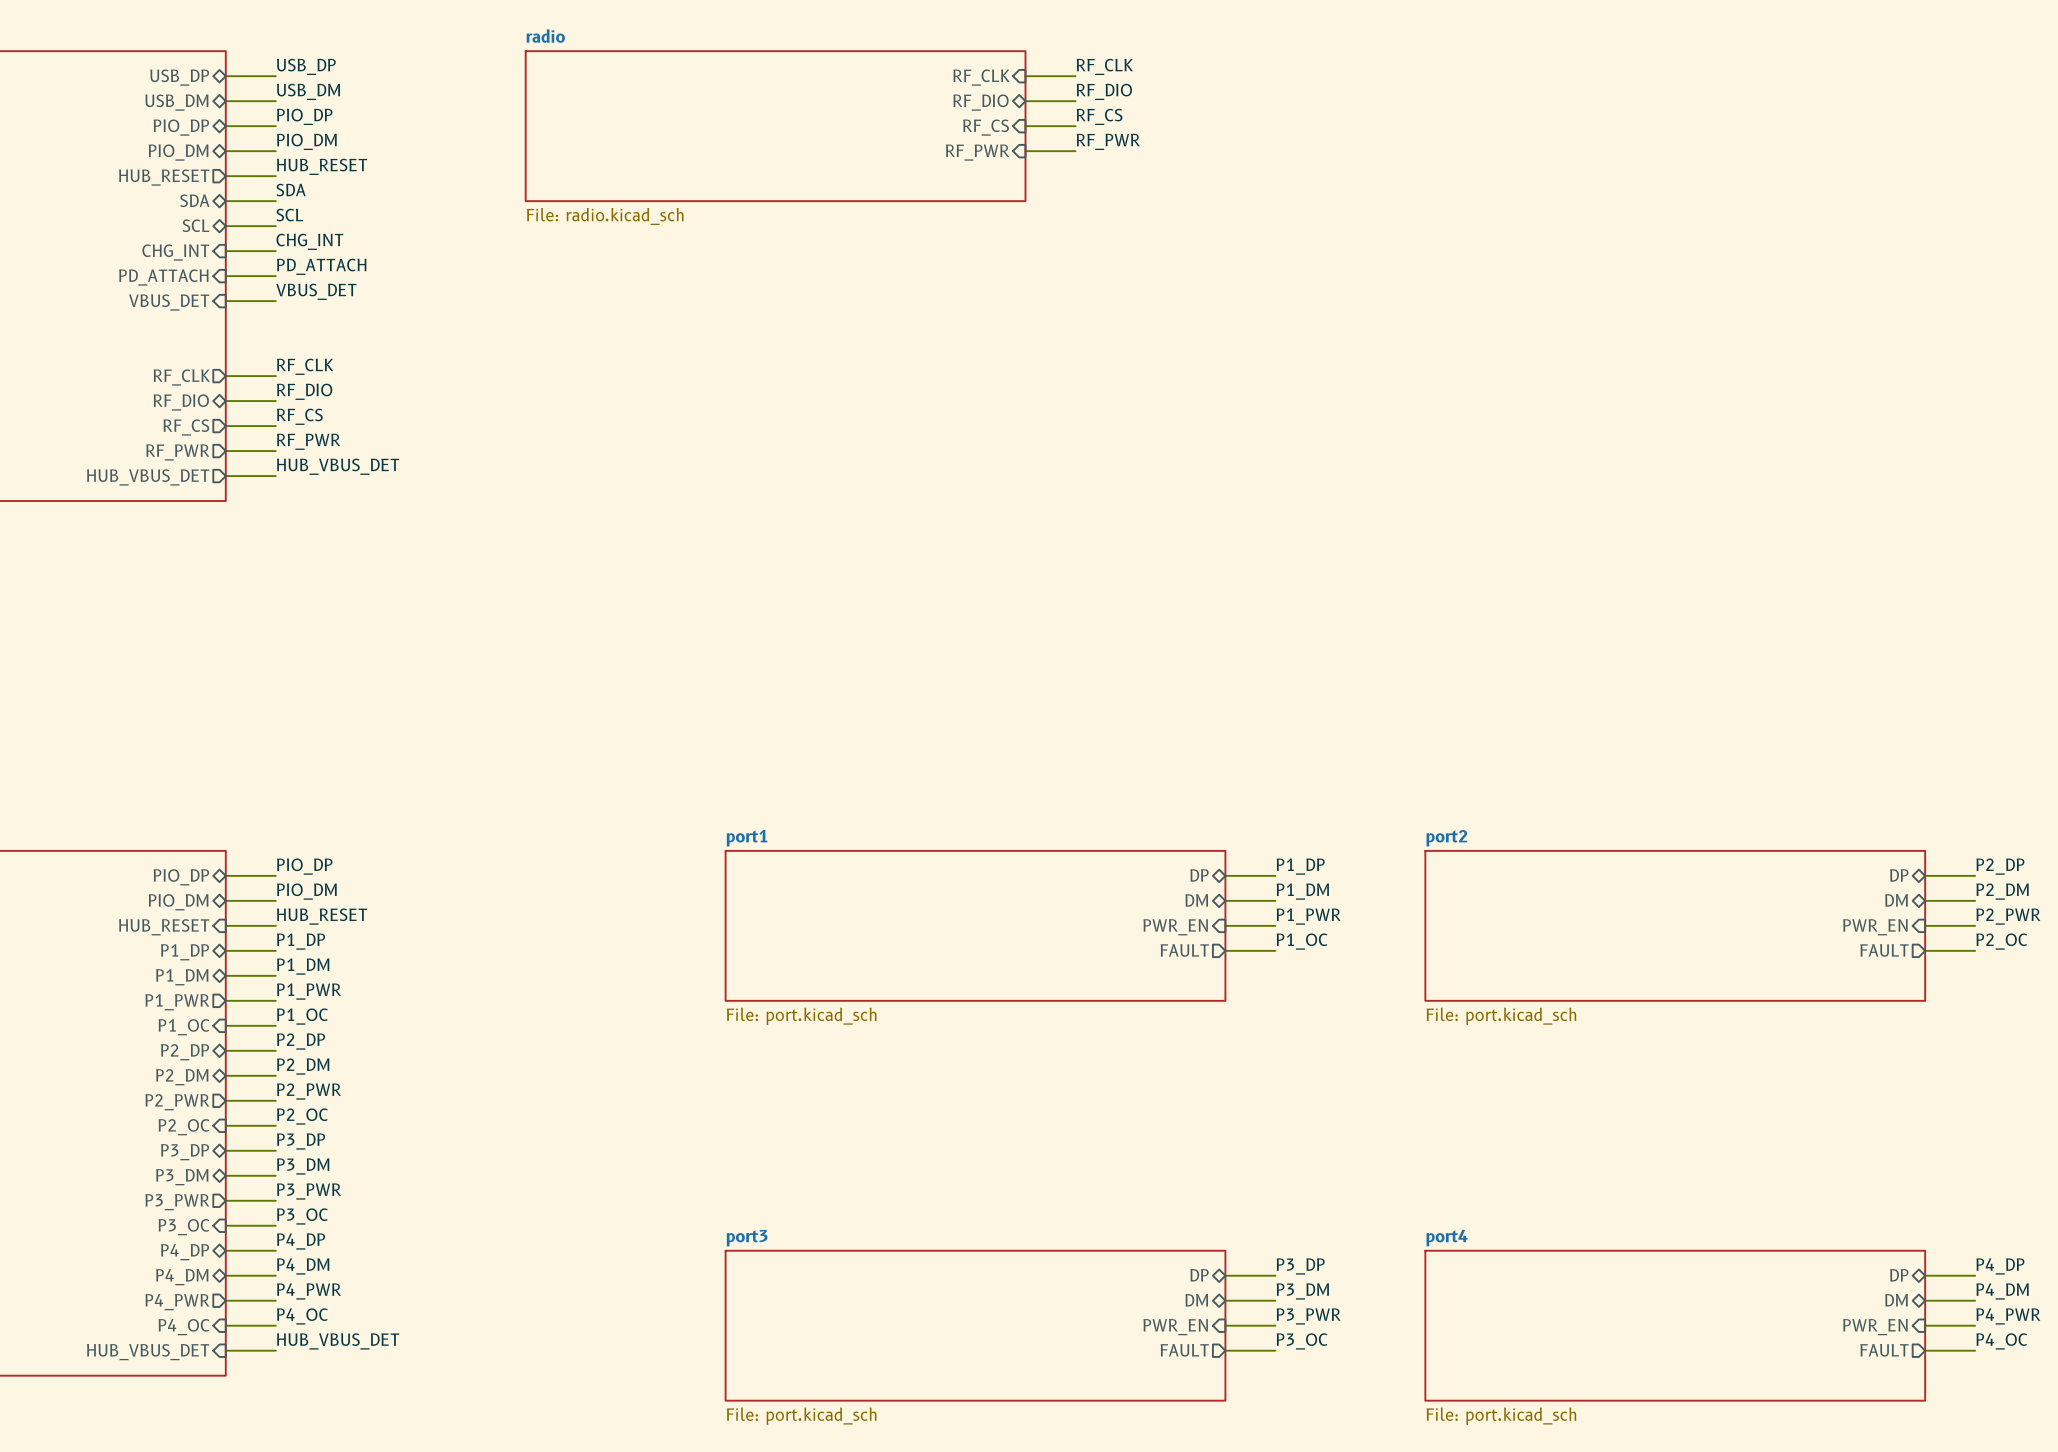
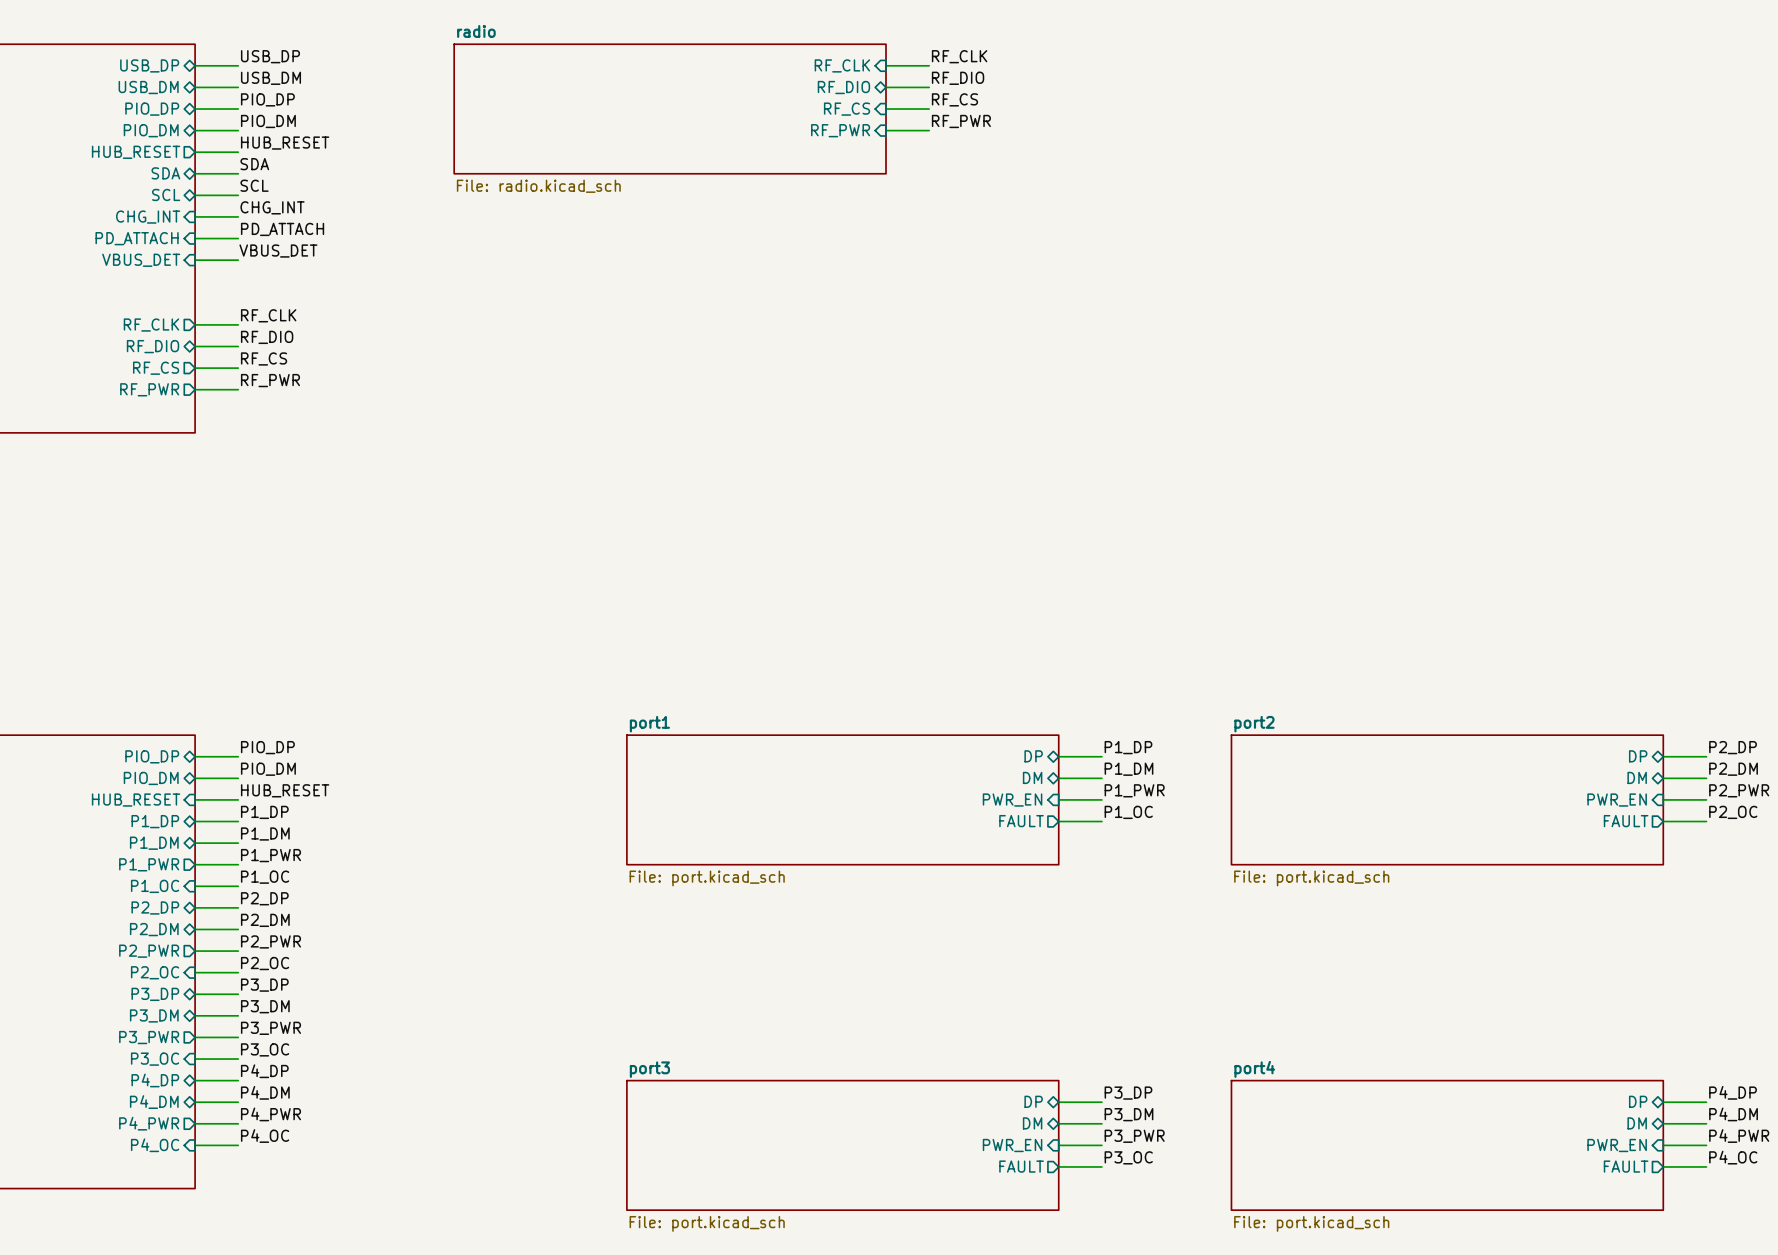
label: HUB_VBUS_DET (338, 466) -> none
wire: (225, 476) (275, 476) -> none
sheet pin: HUB_VBUS_DET (148, 477) -> none
label: HUB_VBUS_DET (338, 1341) -> none
wire: (225, 1350) (275, 1350) -> none
sheet pin: HUB_VBUS_DET (148, 1352) -> none

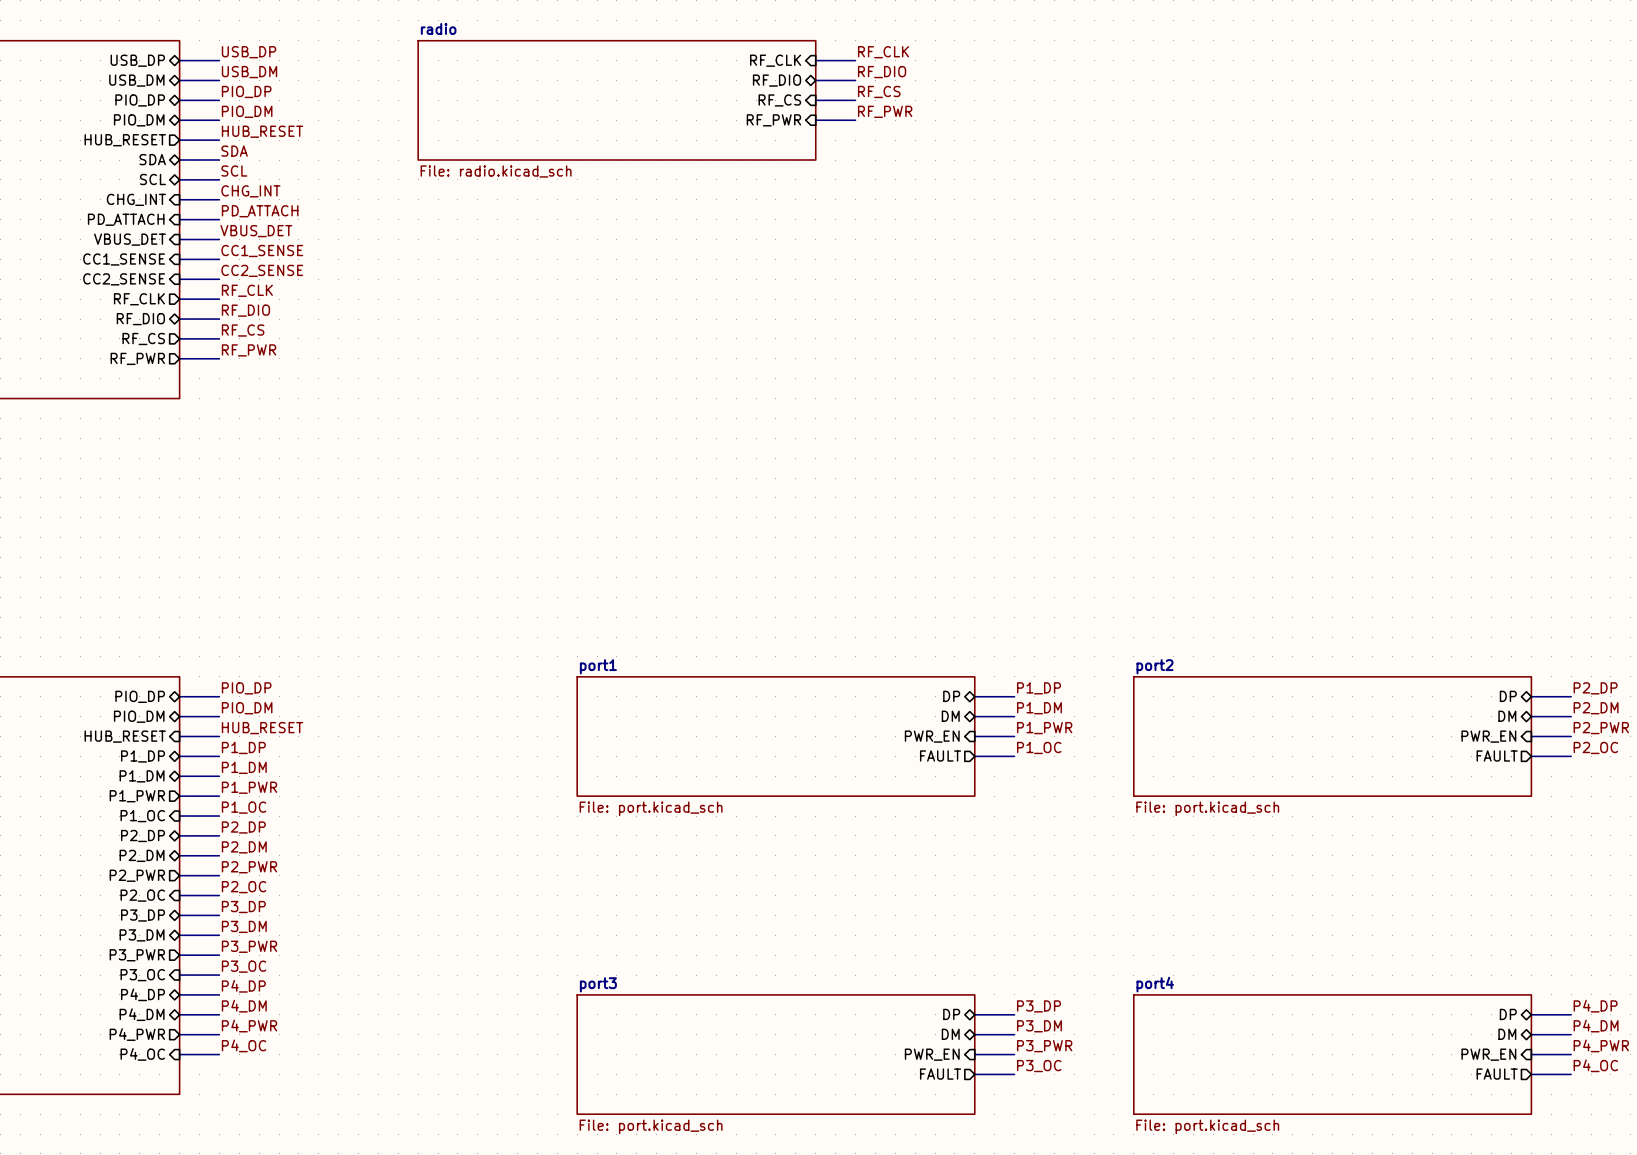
label: none -> CC1_SENSE (262, 251)
sheet pin: none -> CC1_SENSE (124, 259)
wire: none -> (179, 259) (219, 259)
label: none -> CC2_SENSE (262, 270)
sheet pin: none -> CC2_SENSE (124, 279)
wire: none -> (179, 279) (219, 279)

